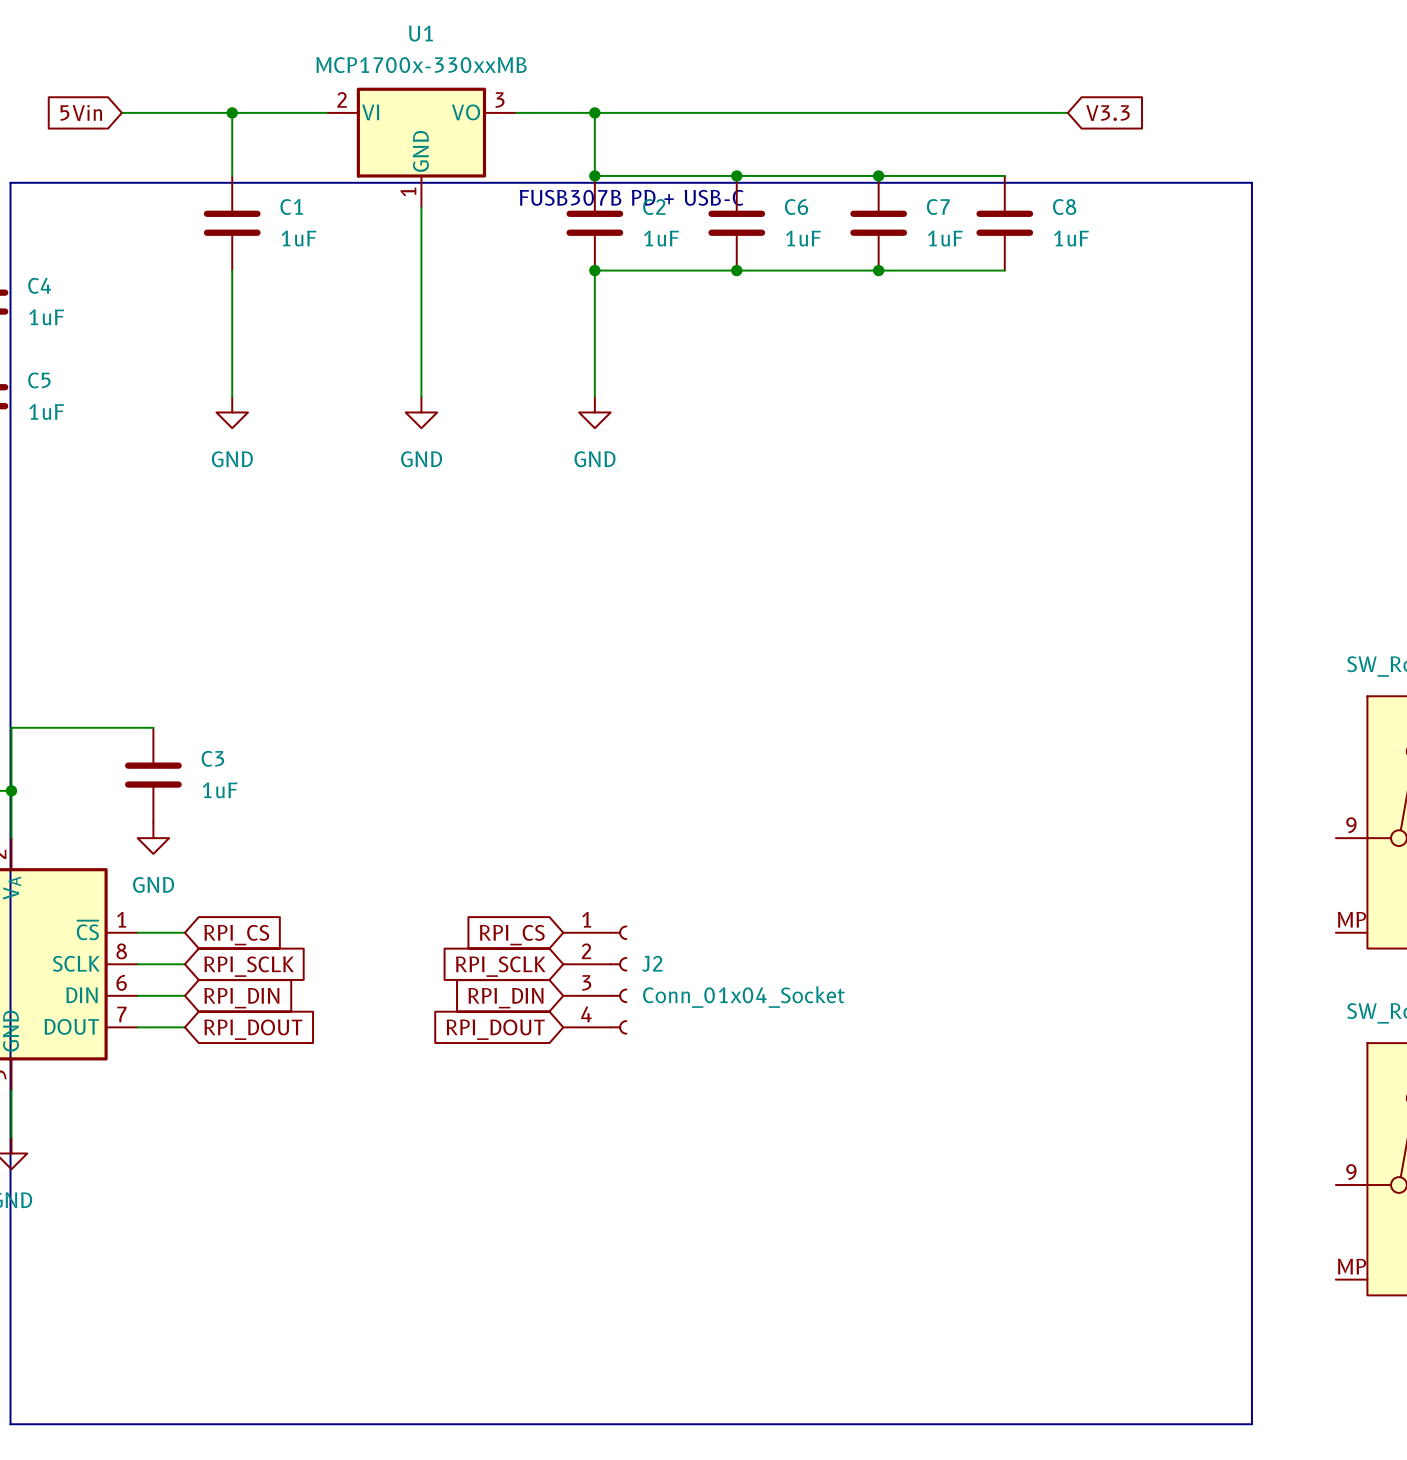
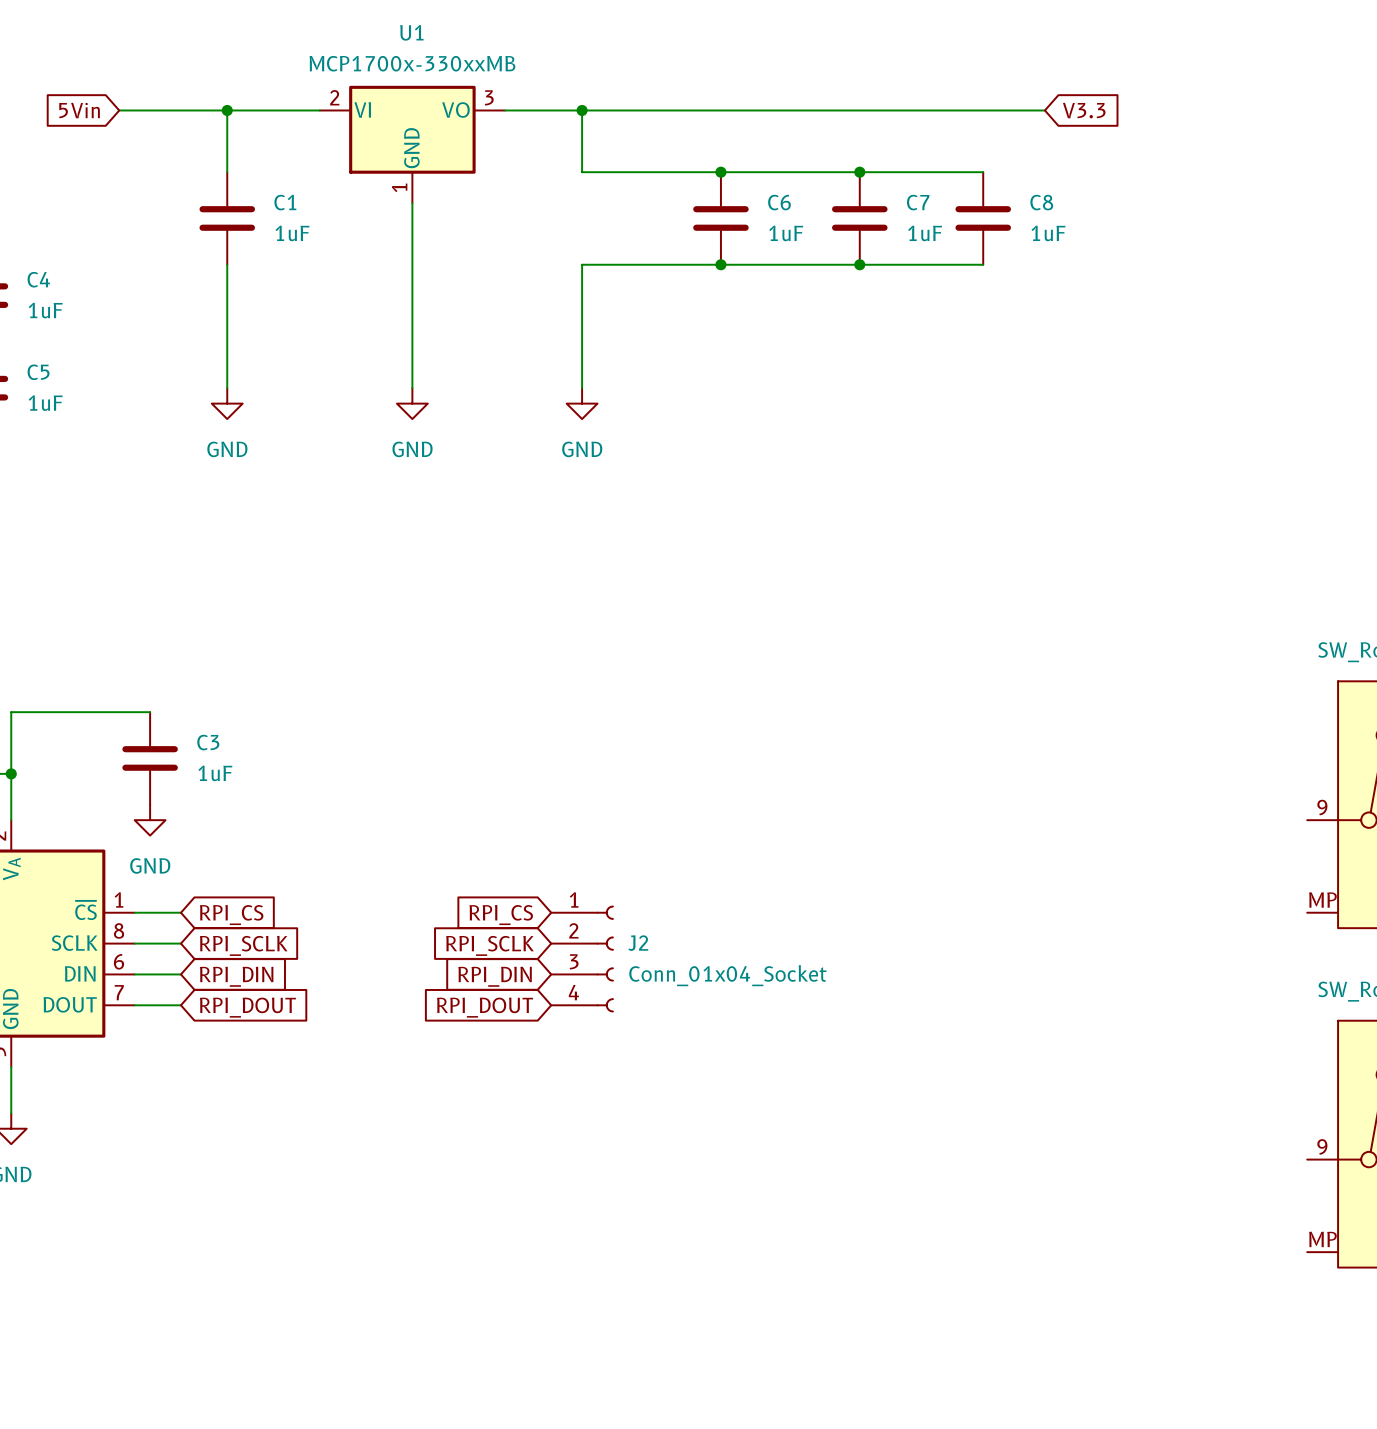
junction: (594, 175) -> none
line: (10, 182) (1251, 182) (1251, 1424) (10, 1424) (10, 182) -> none
text: FUSB307B PD + USB-C (631, 197) -> none
C2: 1uF (594, 223) -> none
junction: (594, 270) -> none

